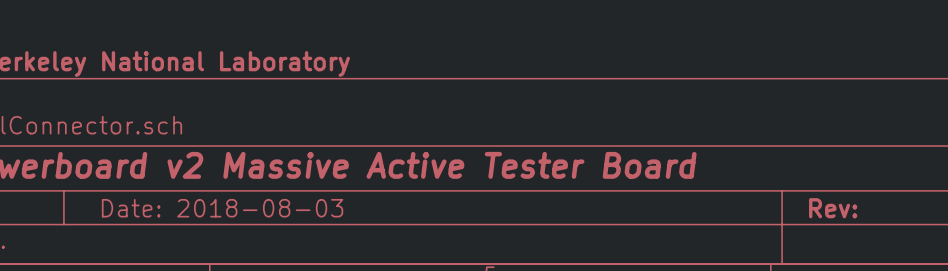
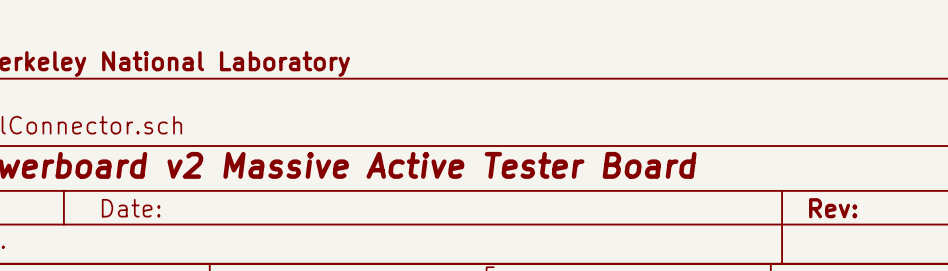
title block: Date: 2018-08-03 (222, 208) -> Date: (131, 208)

